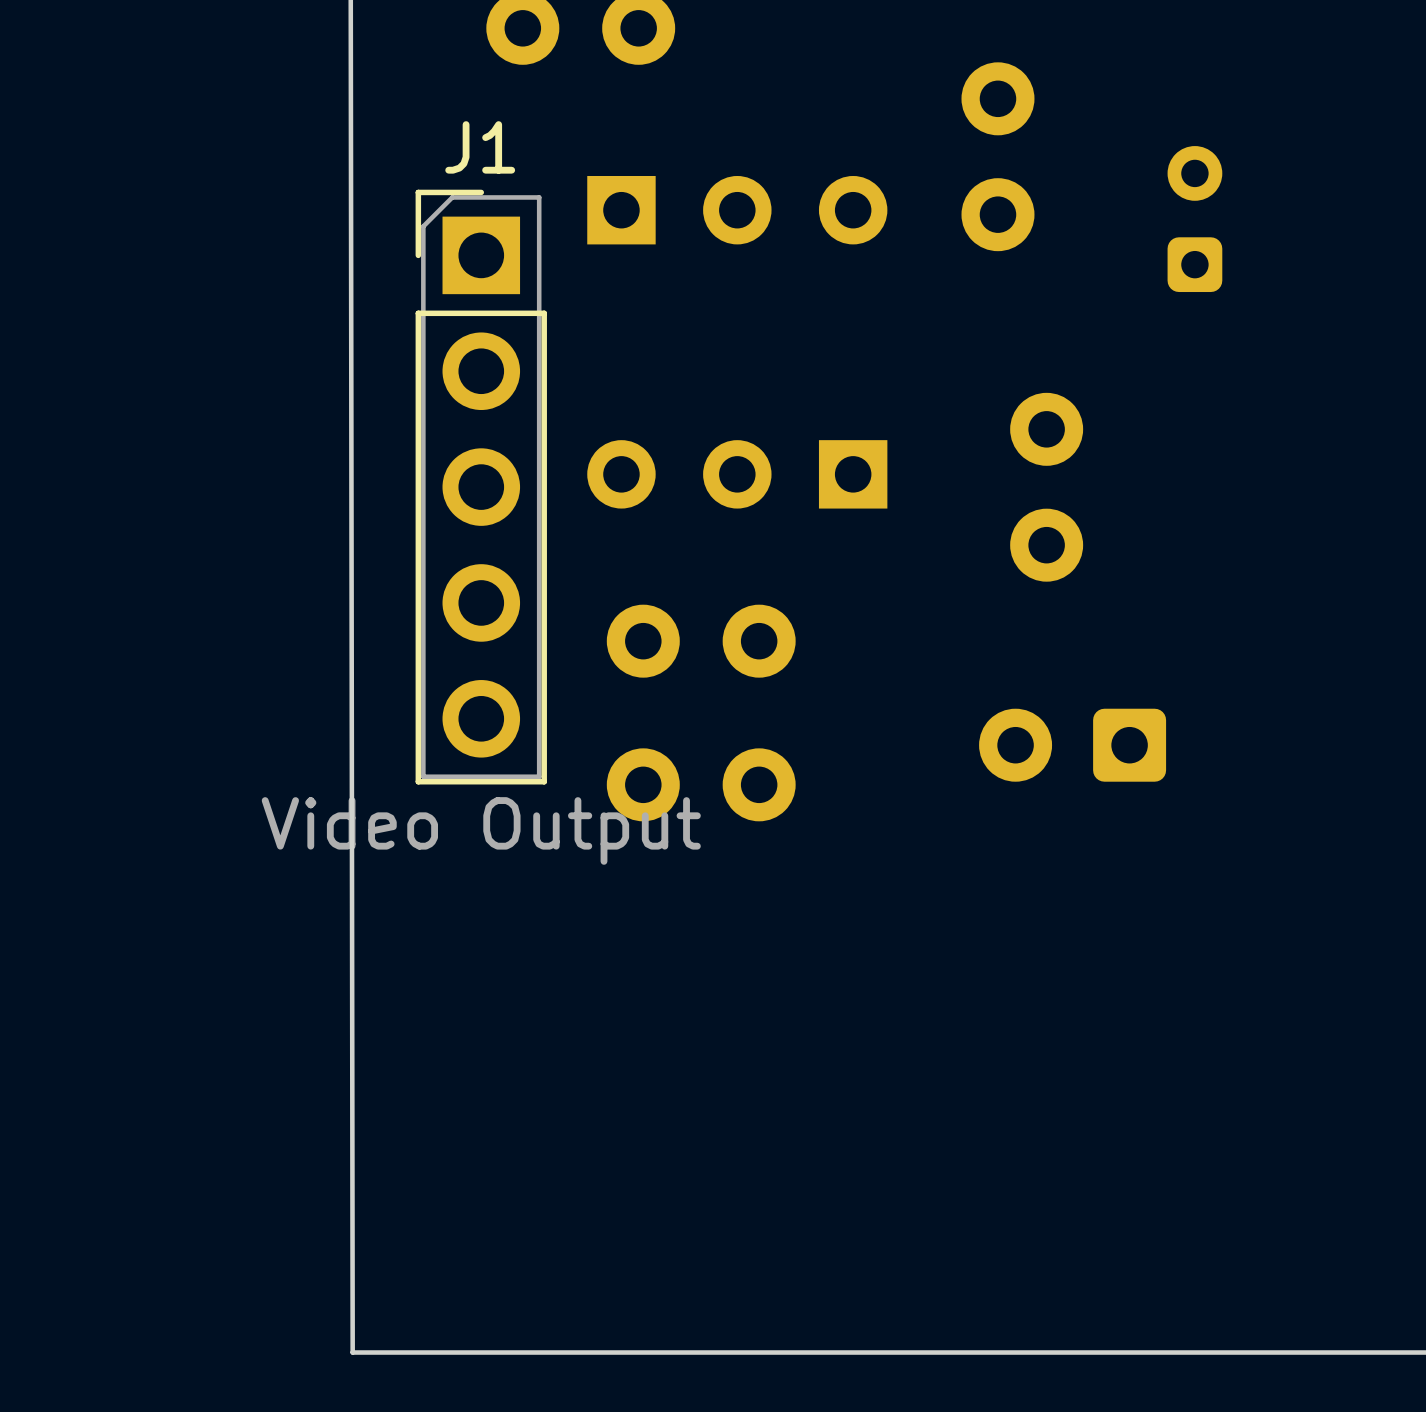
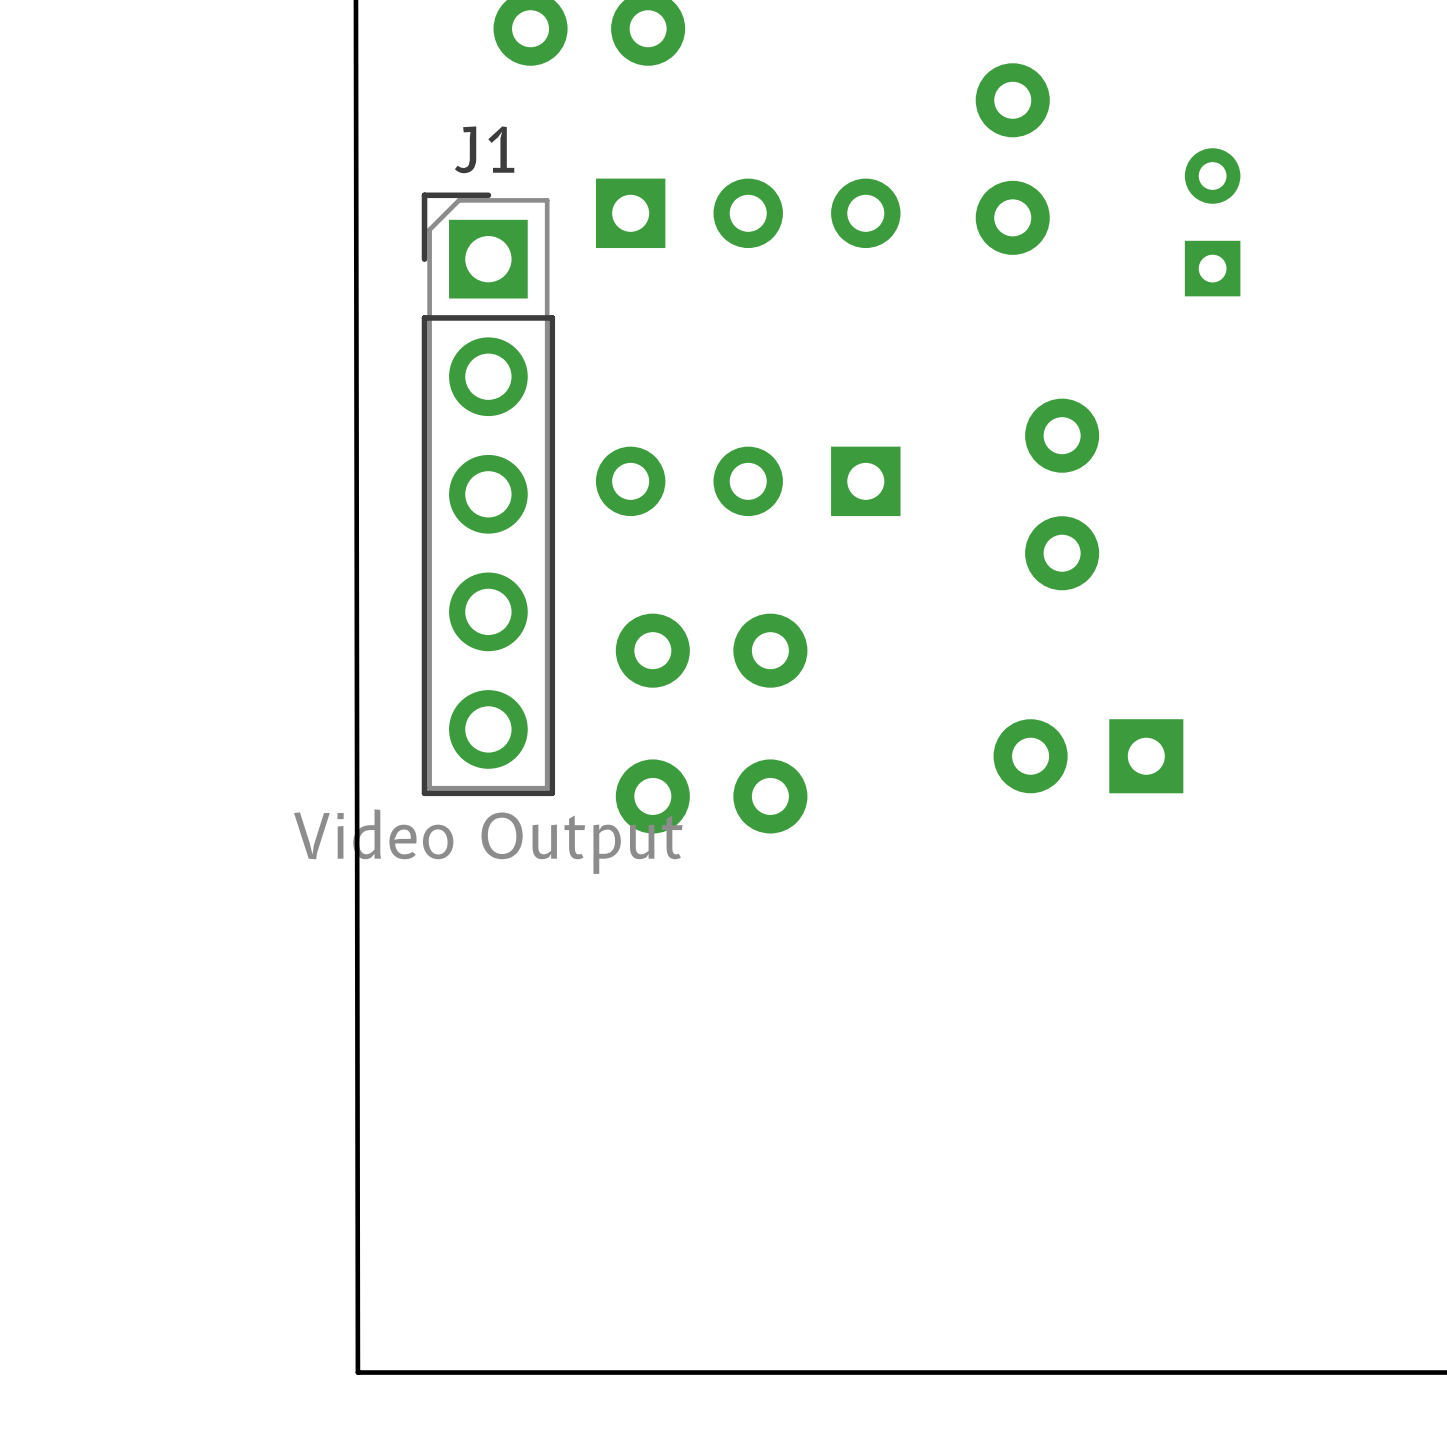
part footprint: [1167, 146, 1223, 293] -> [1184, 148, 1241, 297]
part footprint: [979, 708, 1167, 782] -> [993, 719, 1184, 794]

